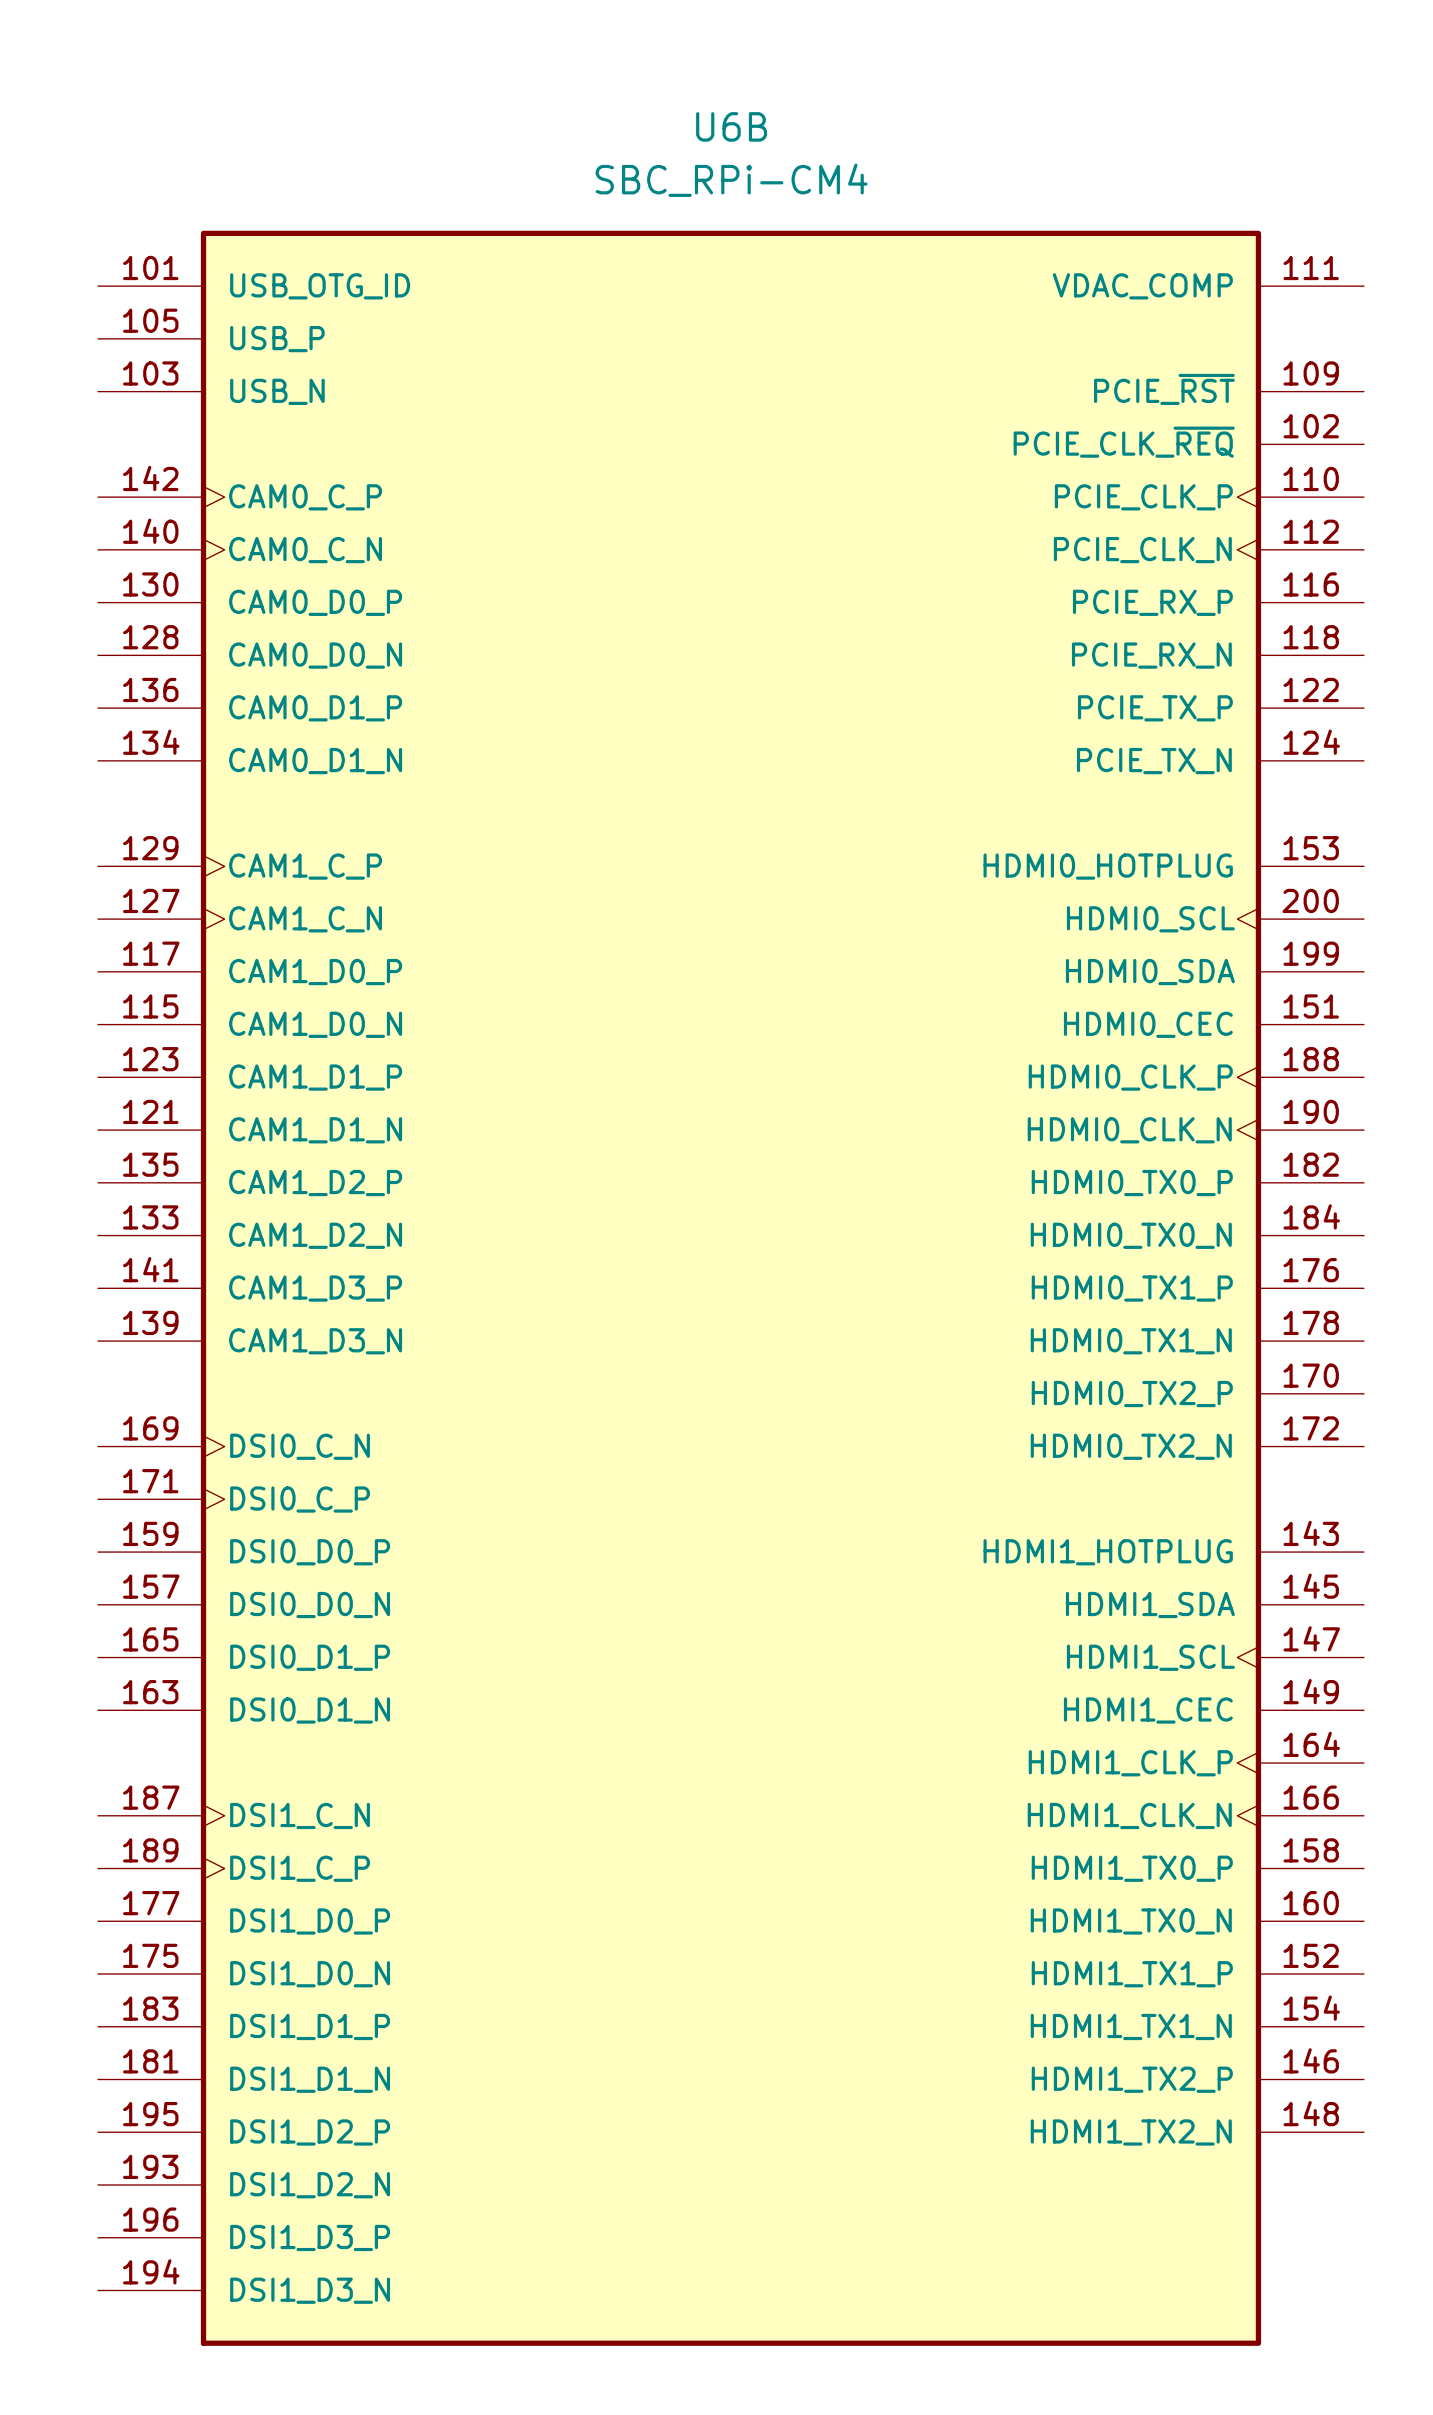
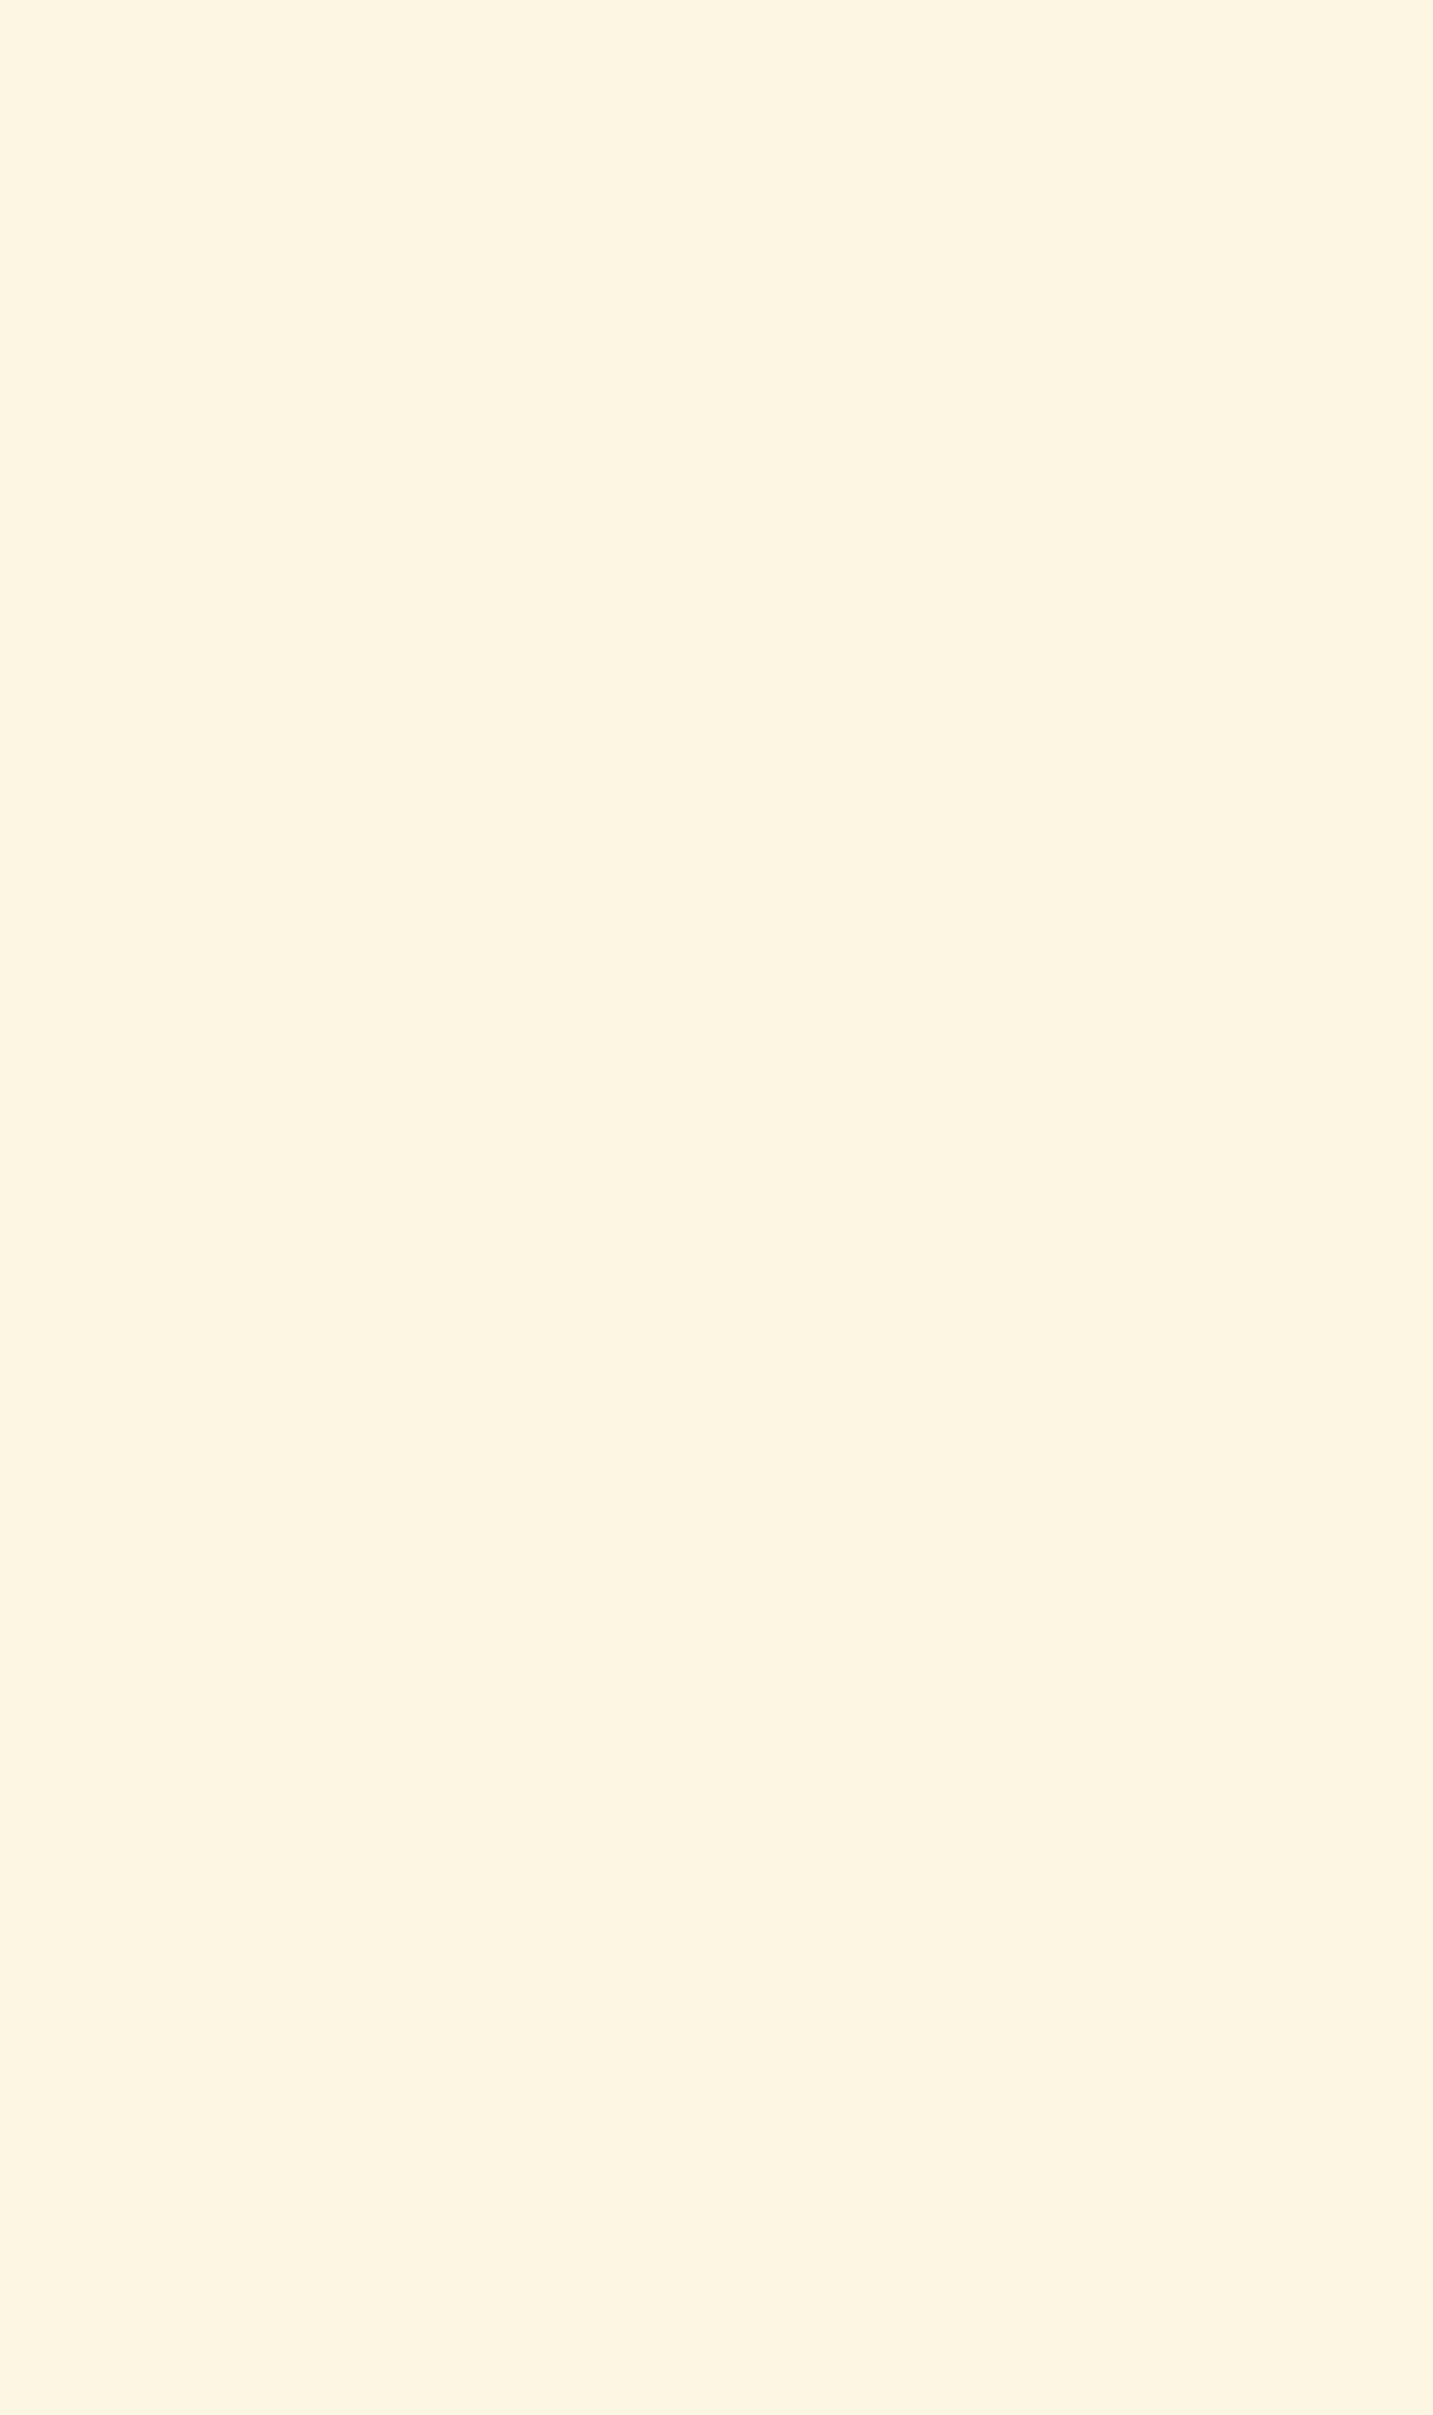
U6B: SBC_RPi-CM4 (730, 1288) -> none

